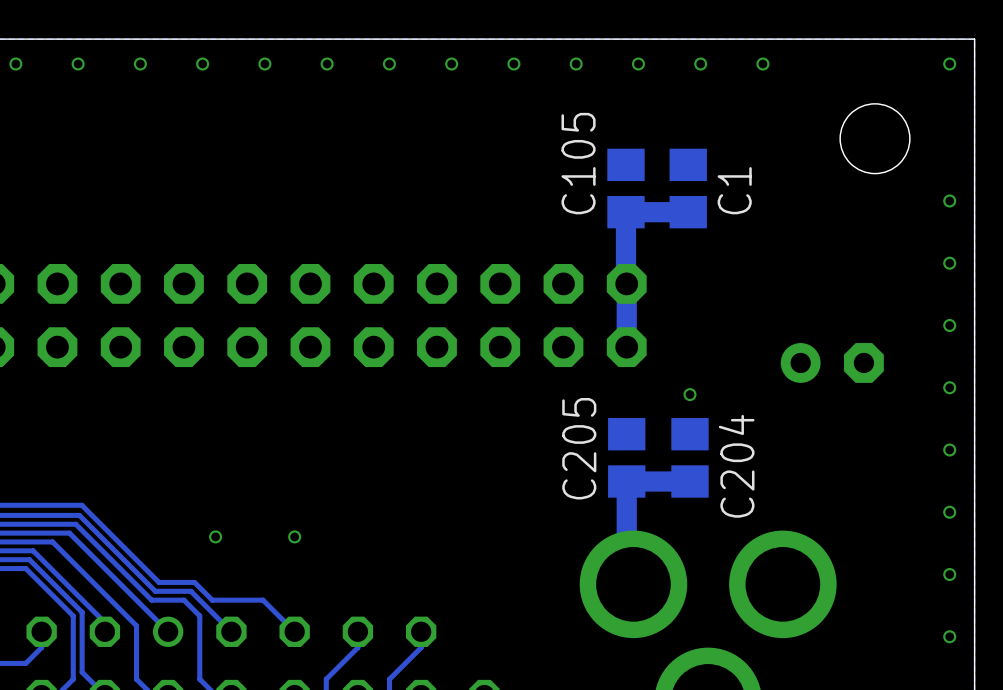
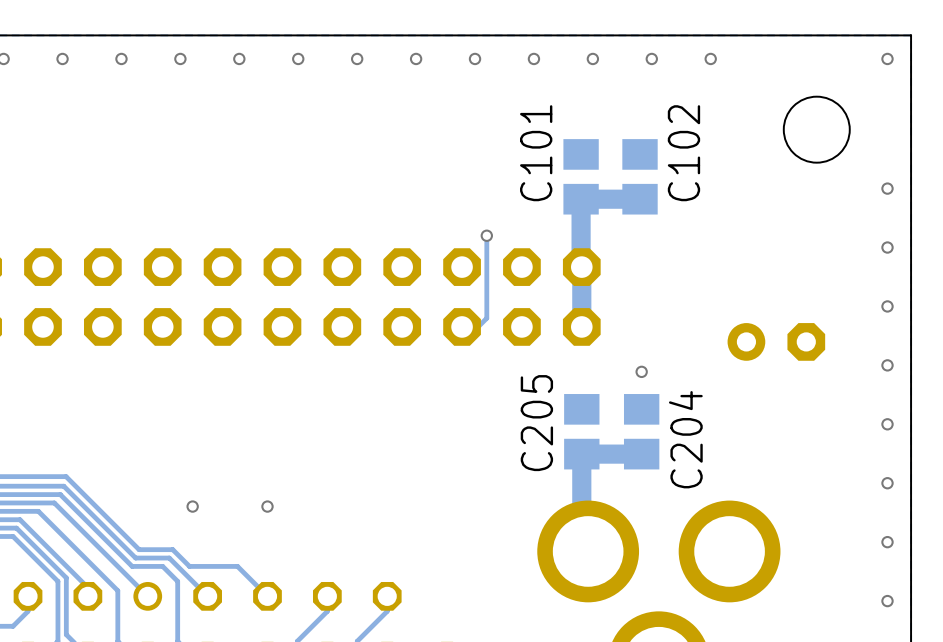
C105 name: C105 (578, 163) -> C101 (536, 153)
C1 name: C1 (734, 190) -> C102 (683, 153)
track: none -> (486, 235) (486, 318) (475, 330) (465, 330) (462, 326)
via: none -> (486, 235)

